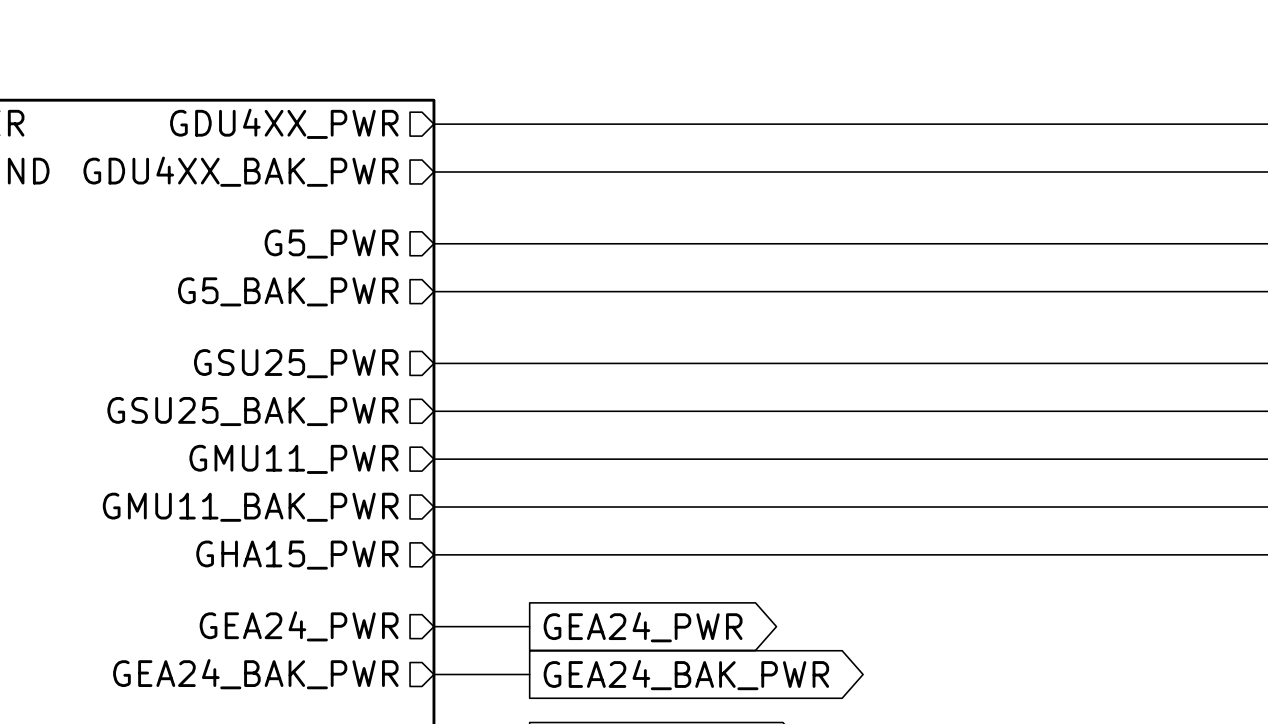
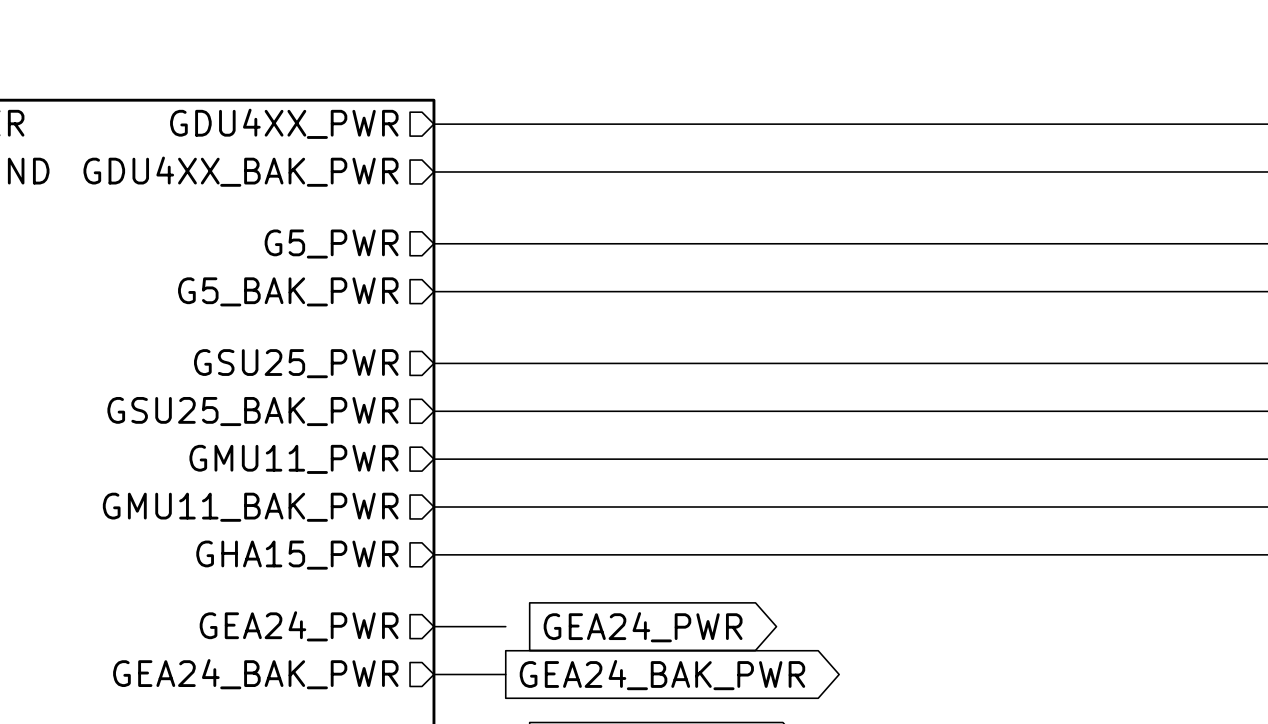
wire: (505, 626) (529, 626) -> none
wire: (505, 674) (529, 674) -> none
global label position: GEA24_BAK_PWR (686, 675) -> GEA24_BAK_PWR (662, 675)

